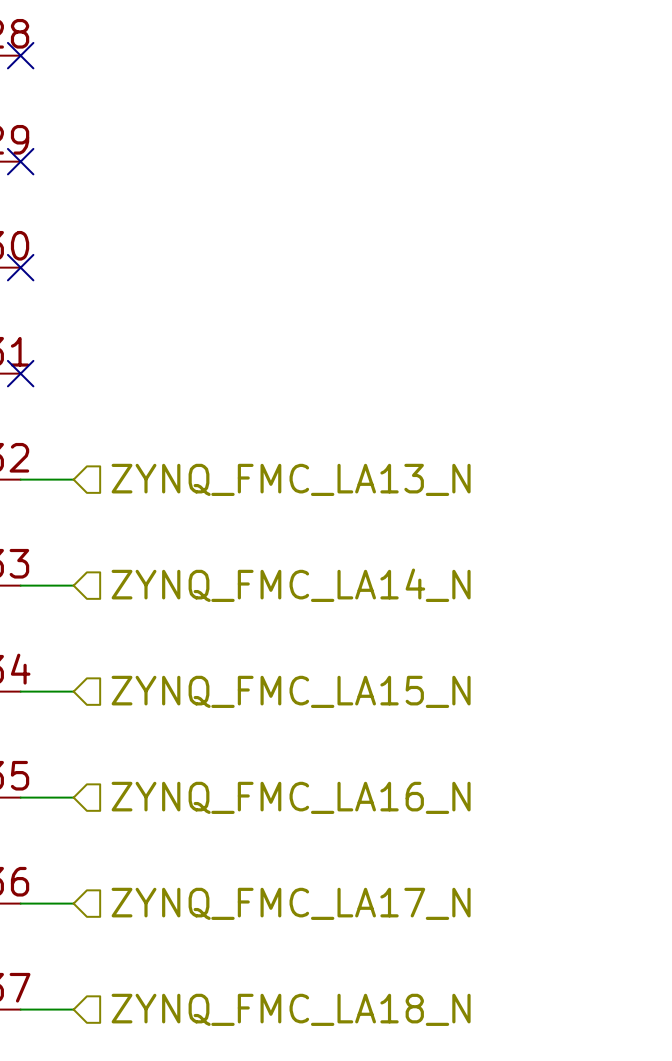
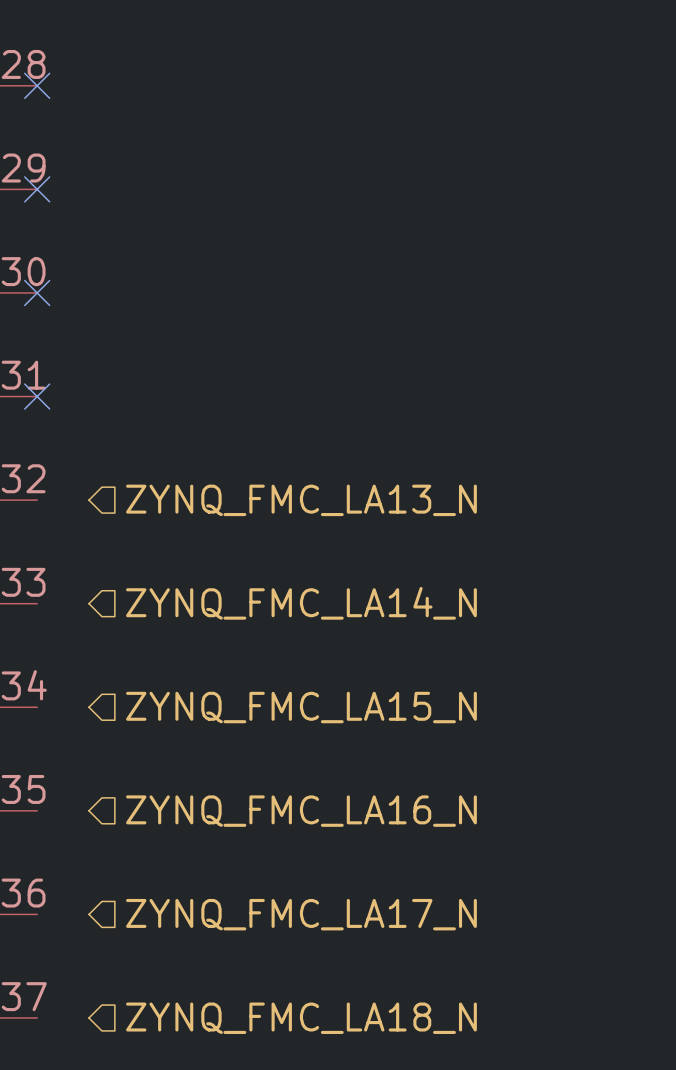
wire: (20, 479) (73, 479) -> none
wire: (20, 585) (73, 585) -> none
wire: (20, 691) (73, 691) -> none
wire: (20, 797) (73, 797) -> none
wire: (20, 903) (73, 903) -> none
wire: (20, 1009) (73, 1009) -> none

